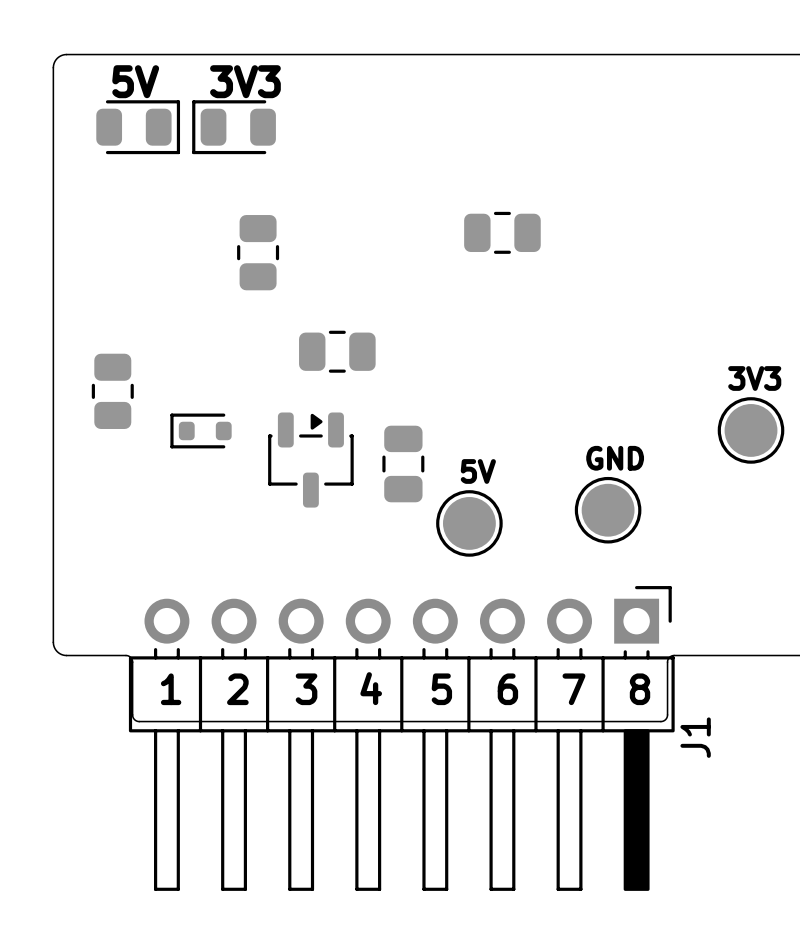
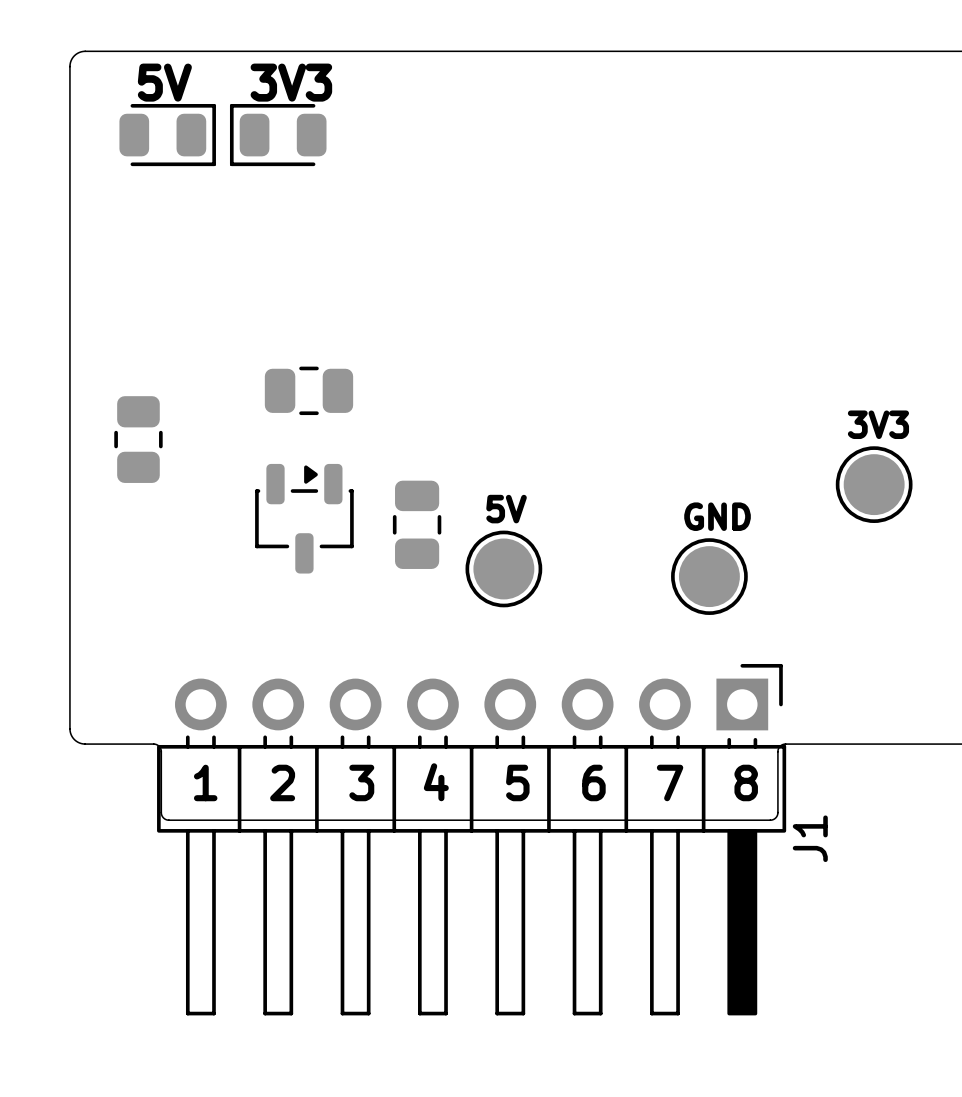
part: (502, 232) -> none
part: (258, 252) -> none
part: none -> (308, 390)
part: (337, 351) -> none
part: (201, 430) -> none
part position: (310, 460) -> (304, 518)
part position: (403, 463) -> (417, 524)
text position: 5V (478, 471) -> 5V (506, 509)
part position: (469, 523) -> (503, 568)

